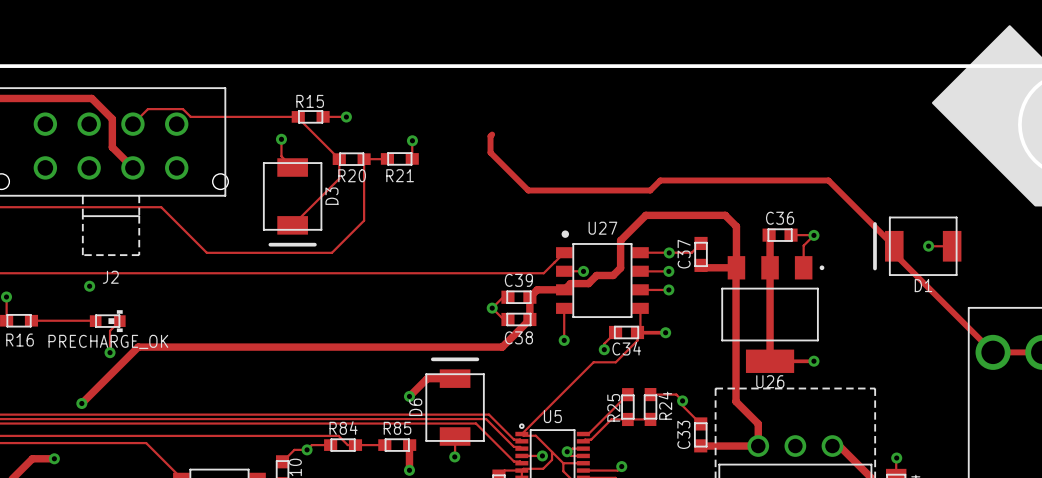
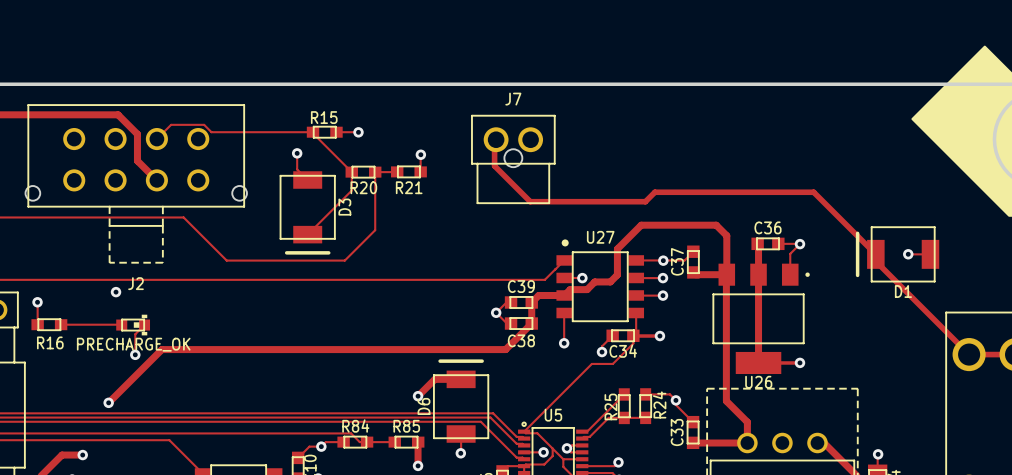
J7: none -> (513, 159)

